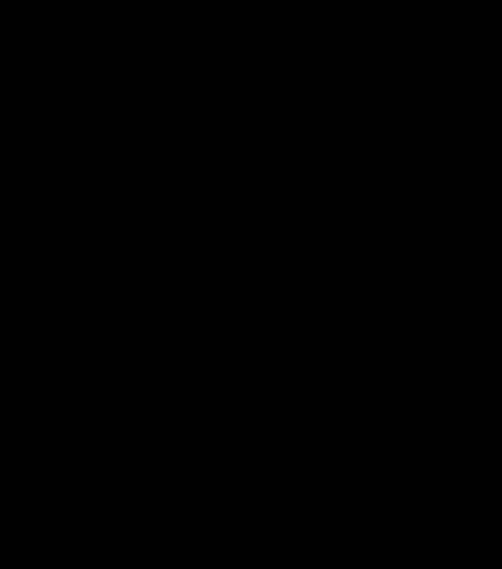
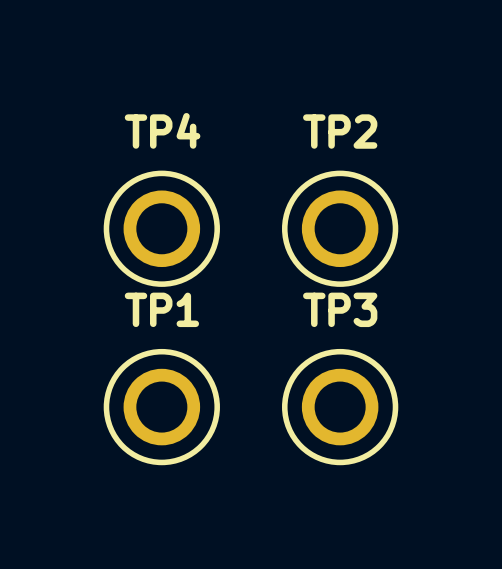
TP4: none -> (161, 228)
TP2: none -> (340, 228)
TP1: none -> (161, 407)
TP3: none -> (340, 407)

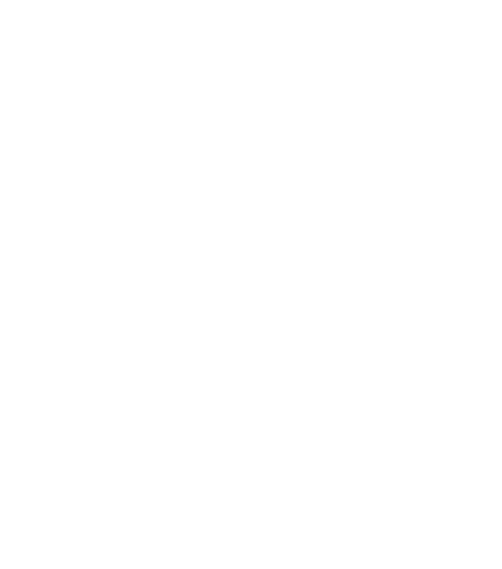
TP4: (161, 228) -> none
TP2: (340, 228) -> none
TP1: (161, 407) -> none
TP3: (340, 407) -> none

